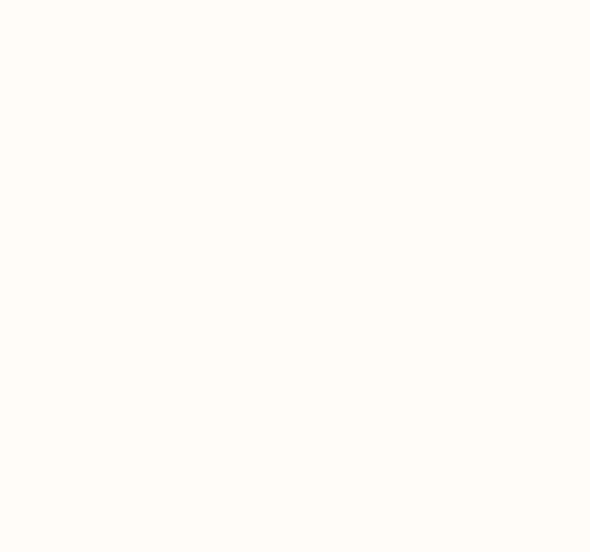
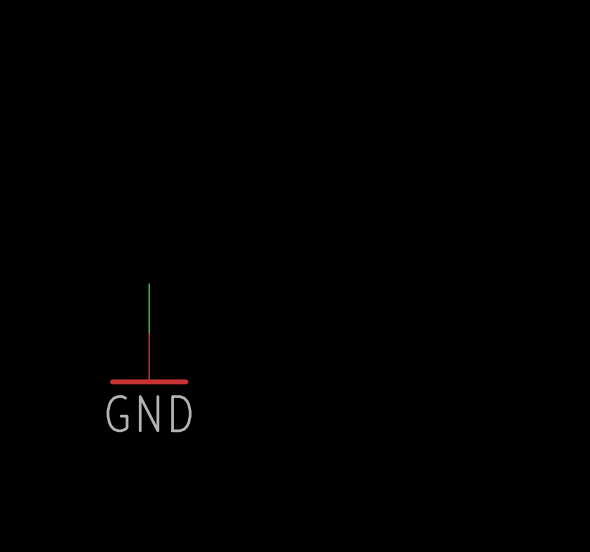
wire: none -> (149, 283) (149, 332)
power symbol: none -> GND (149, 358)

